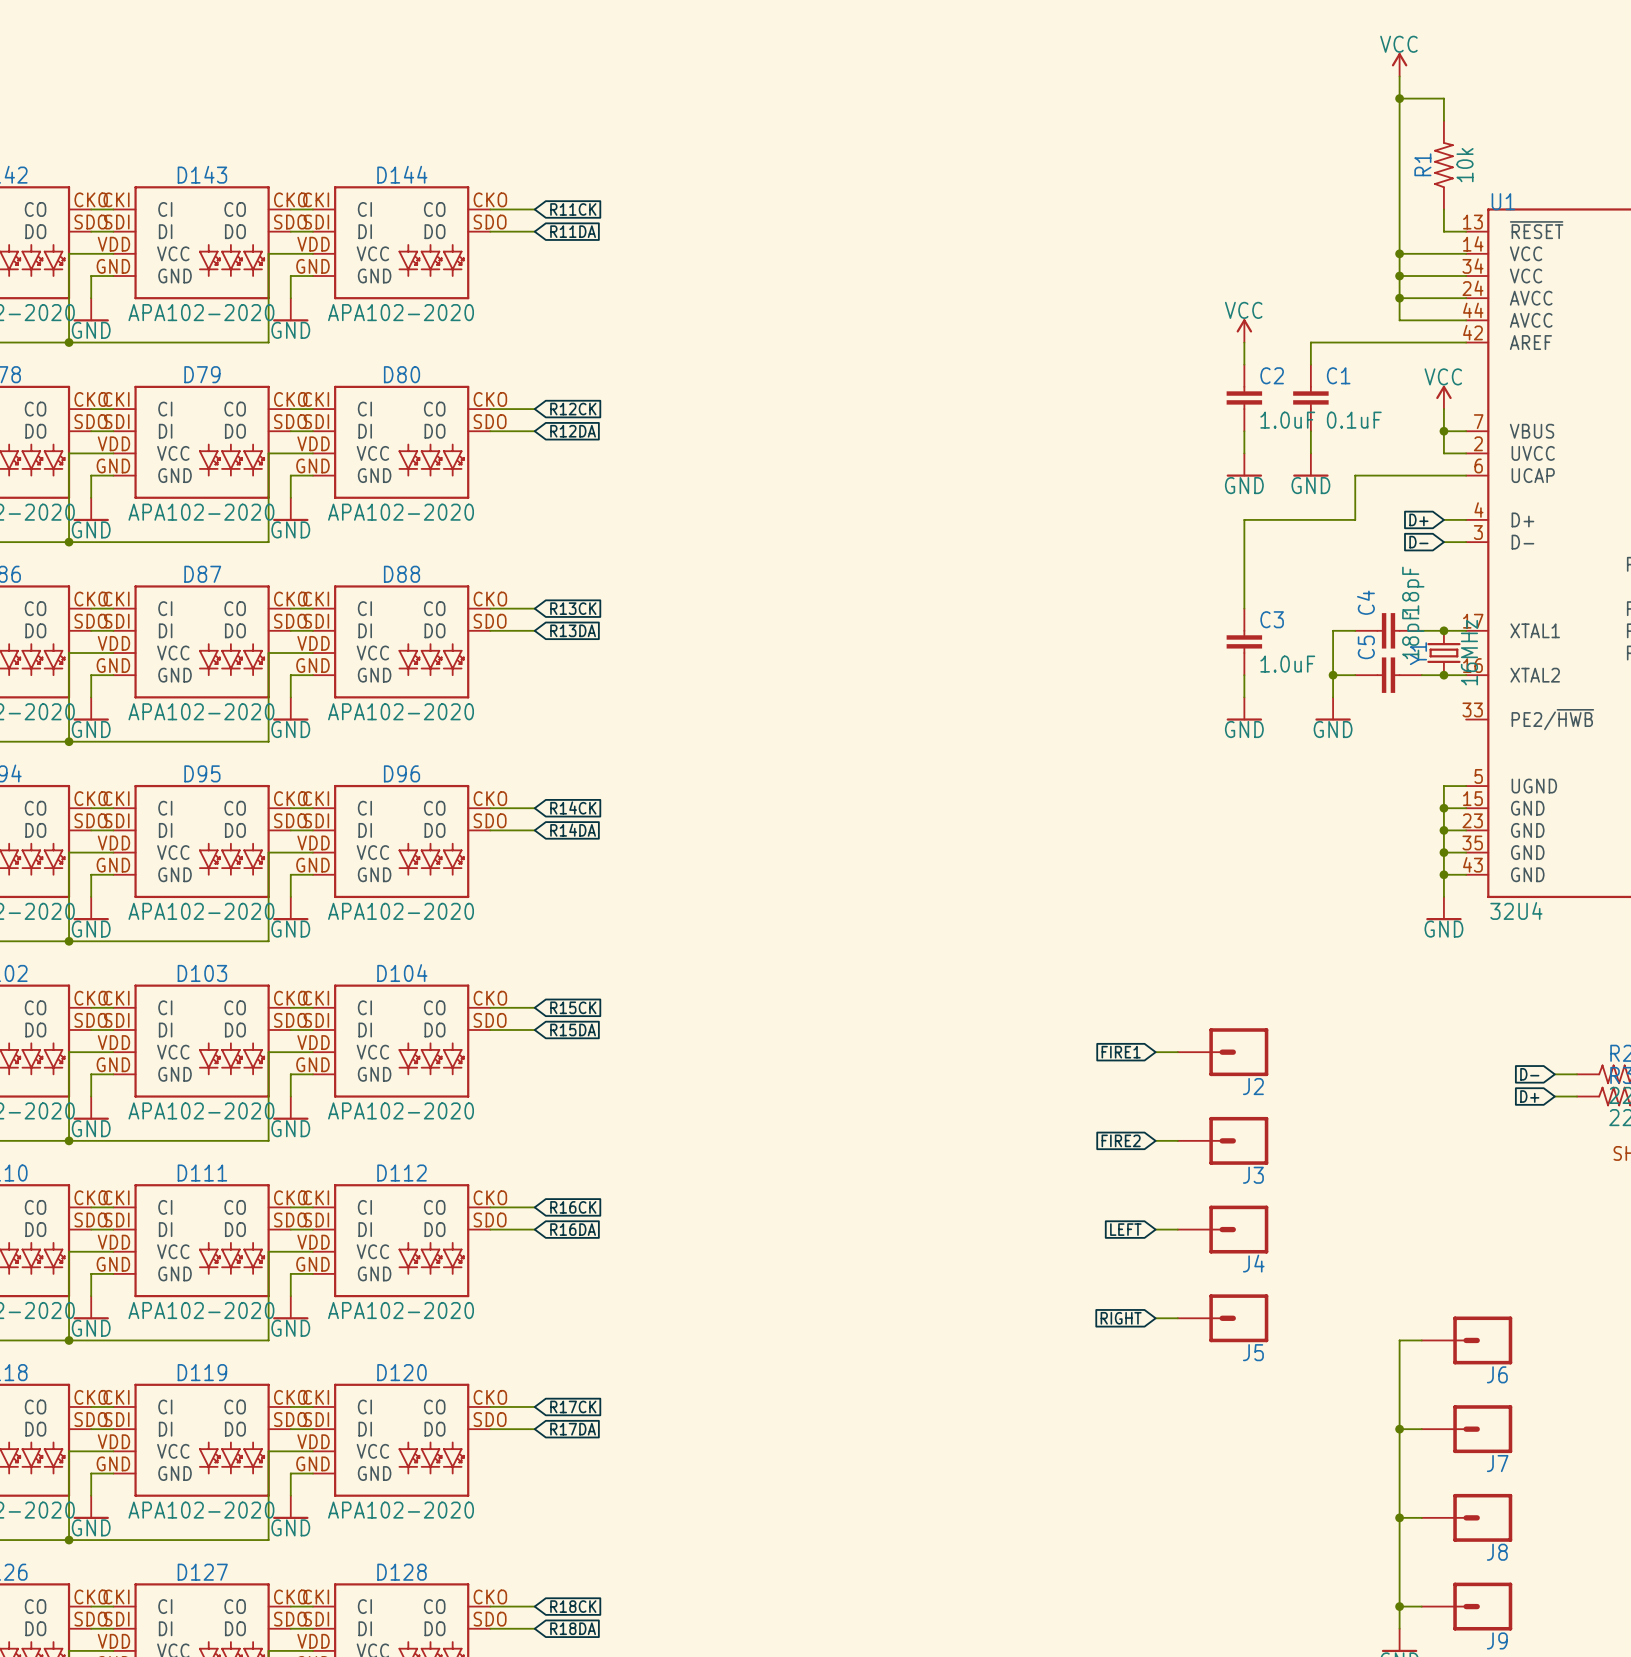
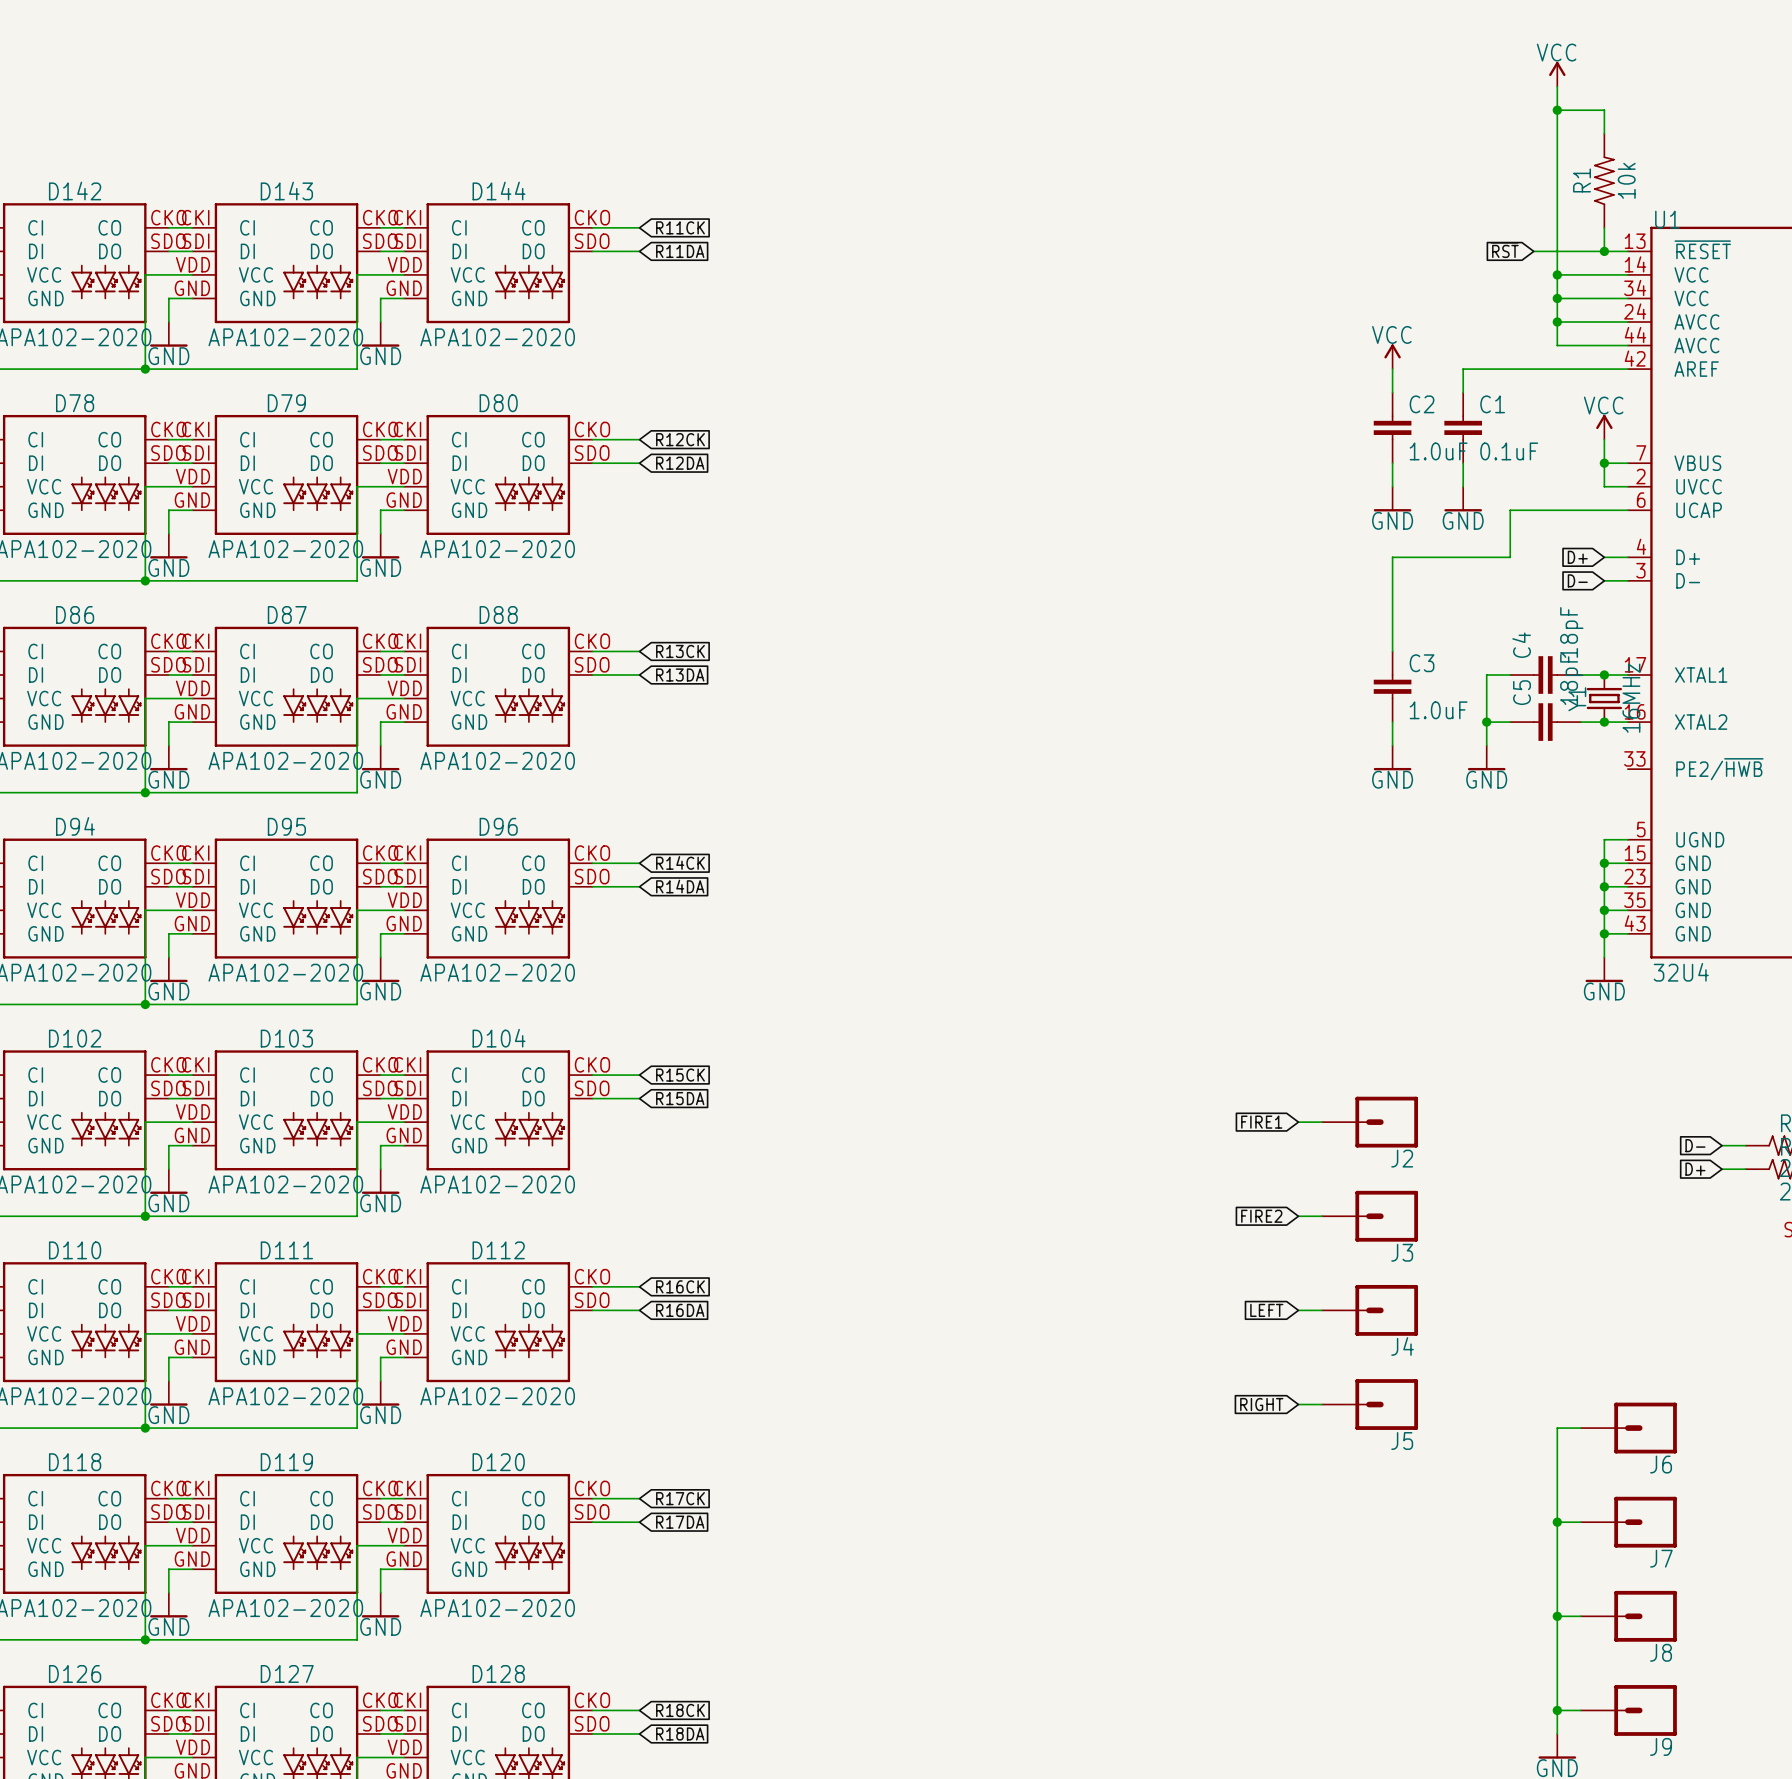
global label: none -> ~{RST} (1504, 250)
wire: none -> (1533, 251) (1604, 251)
junction: none -> (1604, 251)

